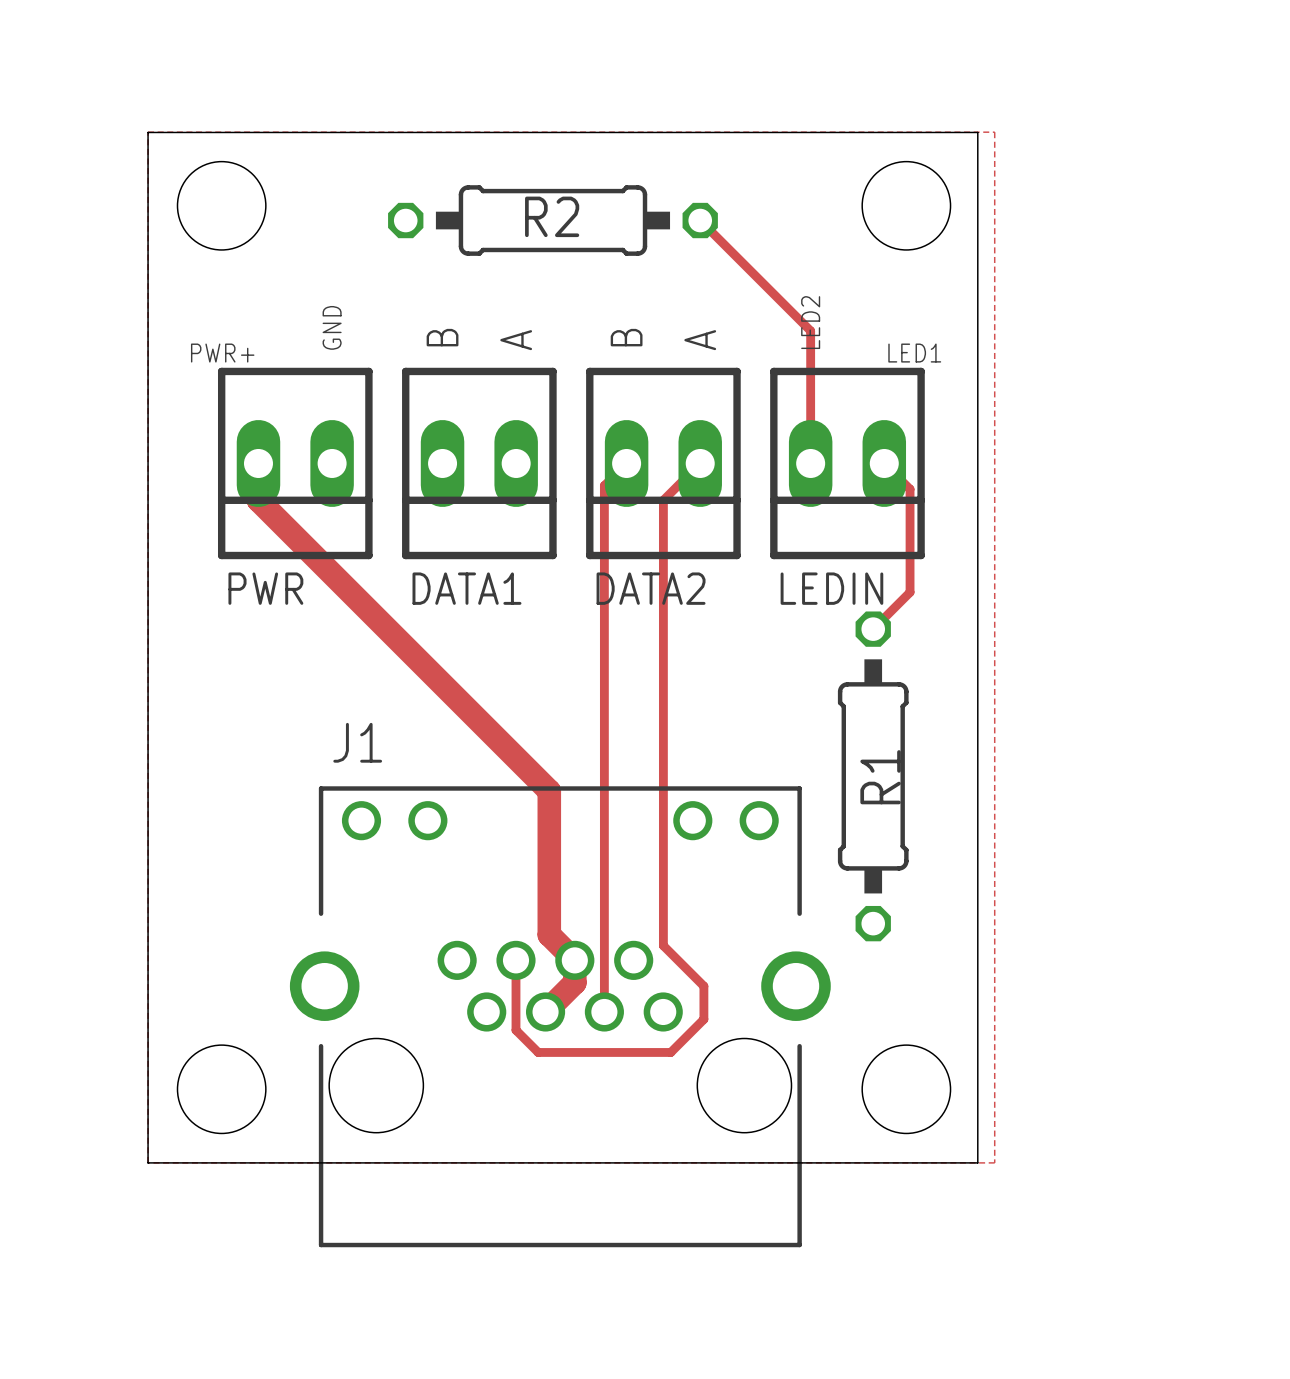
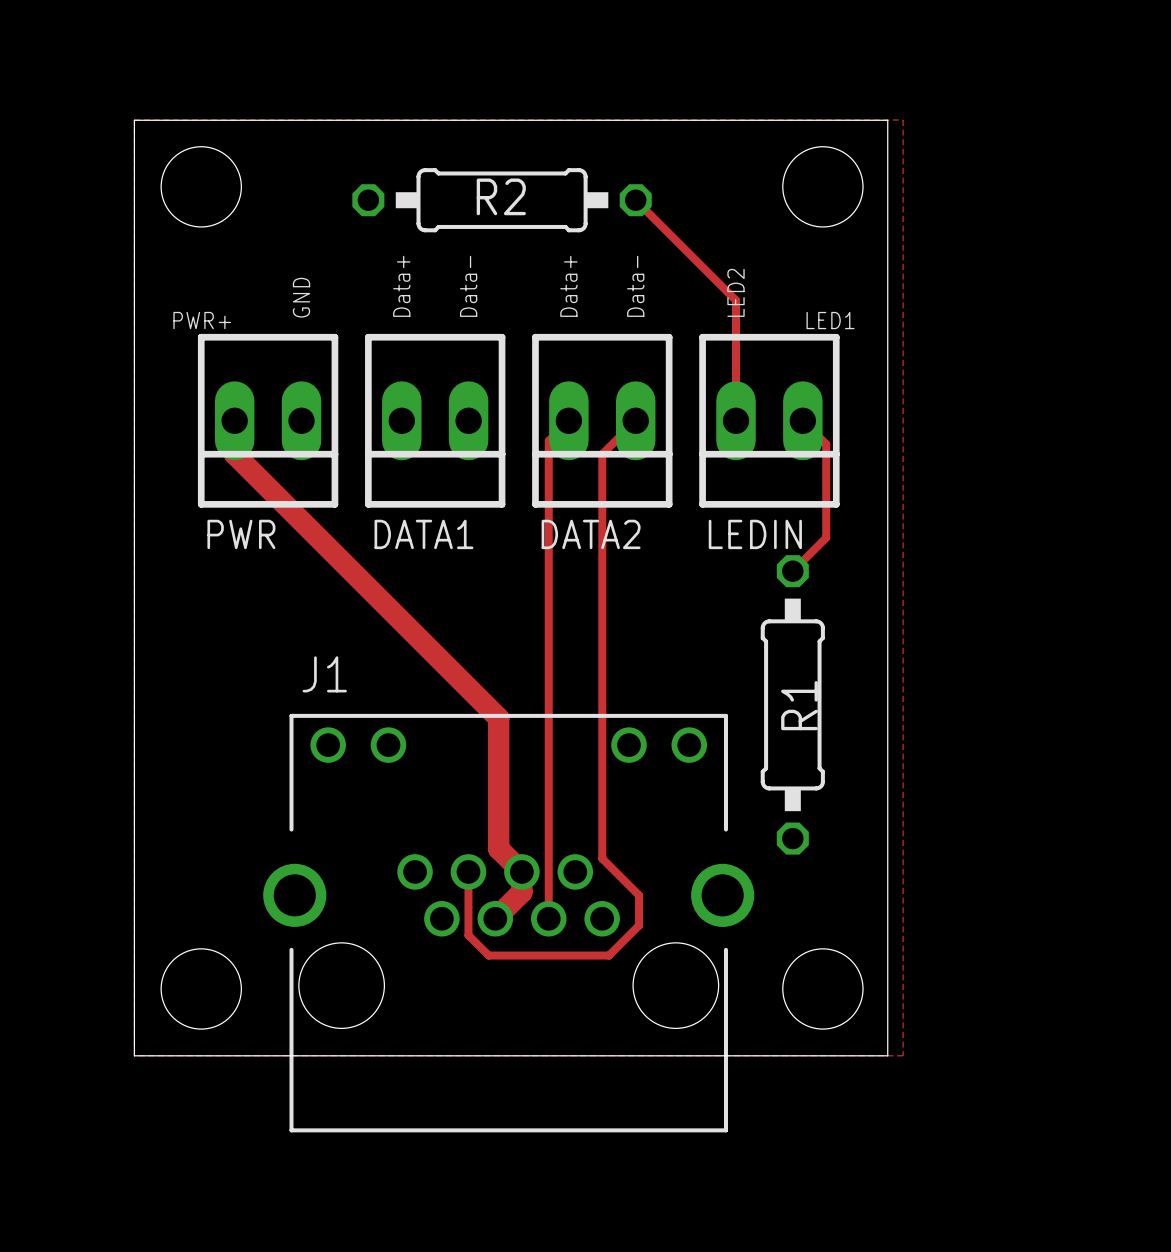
text: B (442, 337) -> Data+ (401, 286)
text: B (626, 337) -> Data+ (568, 286)
text: A (516, 340) -> Data- (468, 286)
text: A (700, 340) -> Data- (635, 286)

